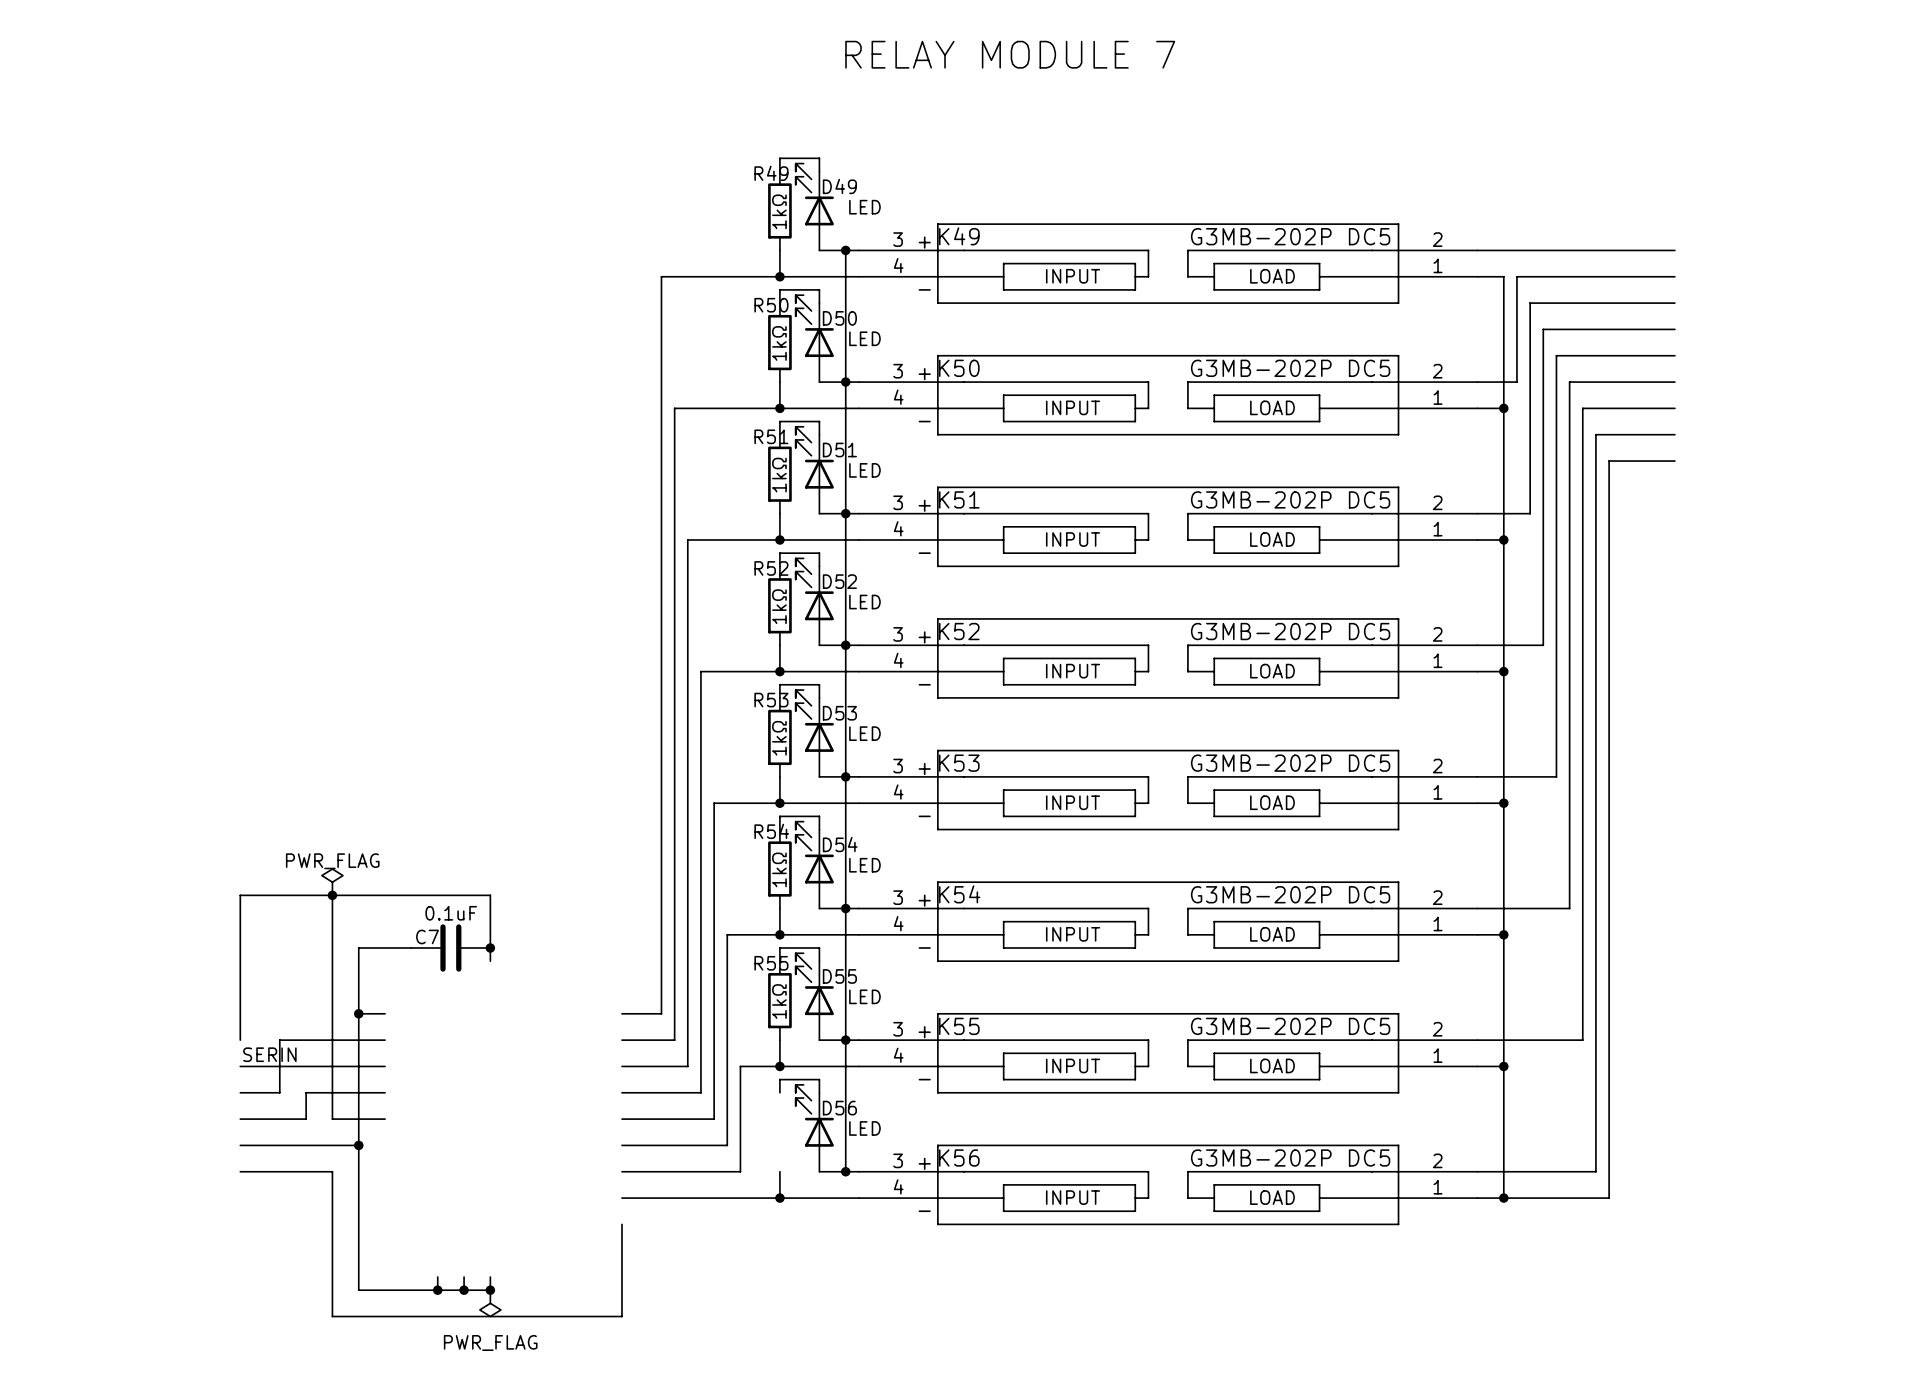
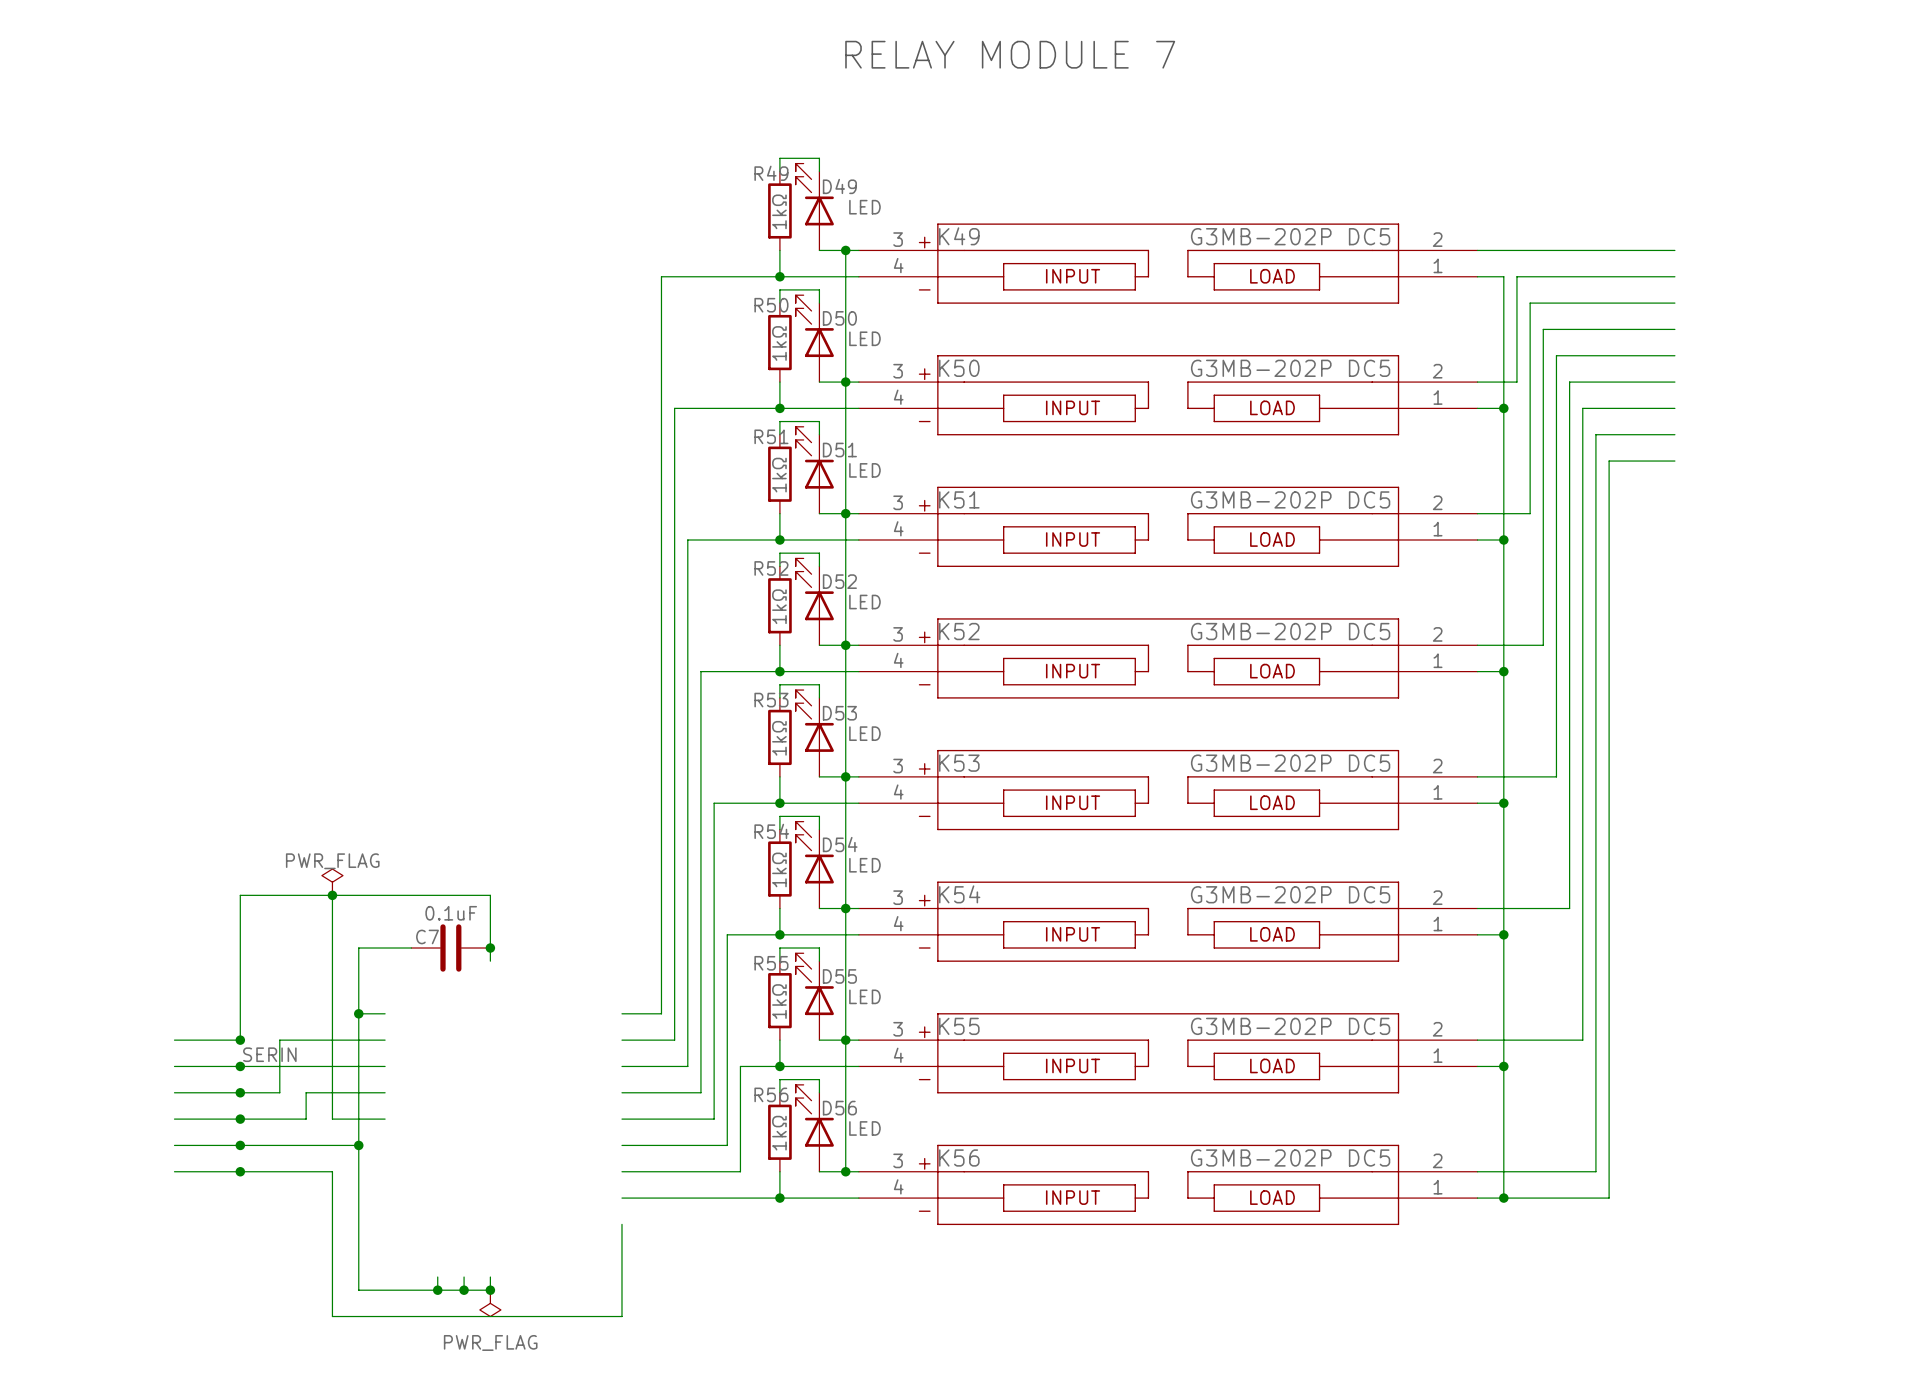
wire: none -> (174, 1040) (240, 1040)
junction: none -> (240, 1040)
wire: none -> (174, 1066) (240, 1066)
junction: none -> (240, 1066)
wire: none -> (174, 1092) (240, 1092)
junction: none -> (240, 1092)
wire: none -> (174, 1119) (240, 1119)
junction: none -> (240, 1119)
R56: none -> 1kΩ (779, 1132)
wire: none -> (174, 1145) (240, 1145)
junction: none -> (240, 1145)
wire: none -> (174, 1171) (240, 1171)
junction: none -> (240, 1171)

